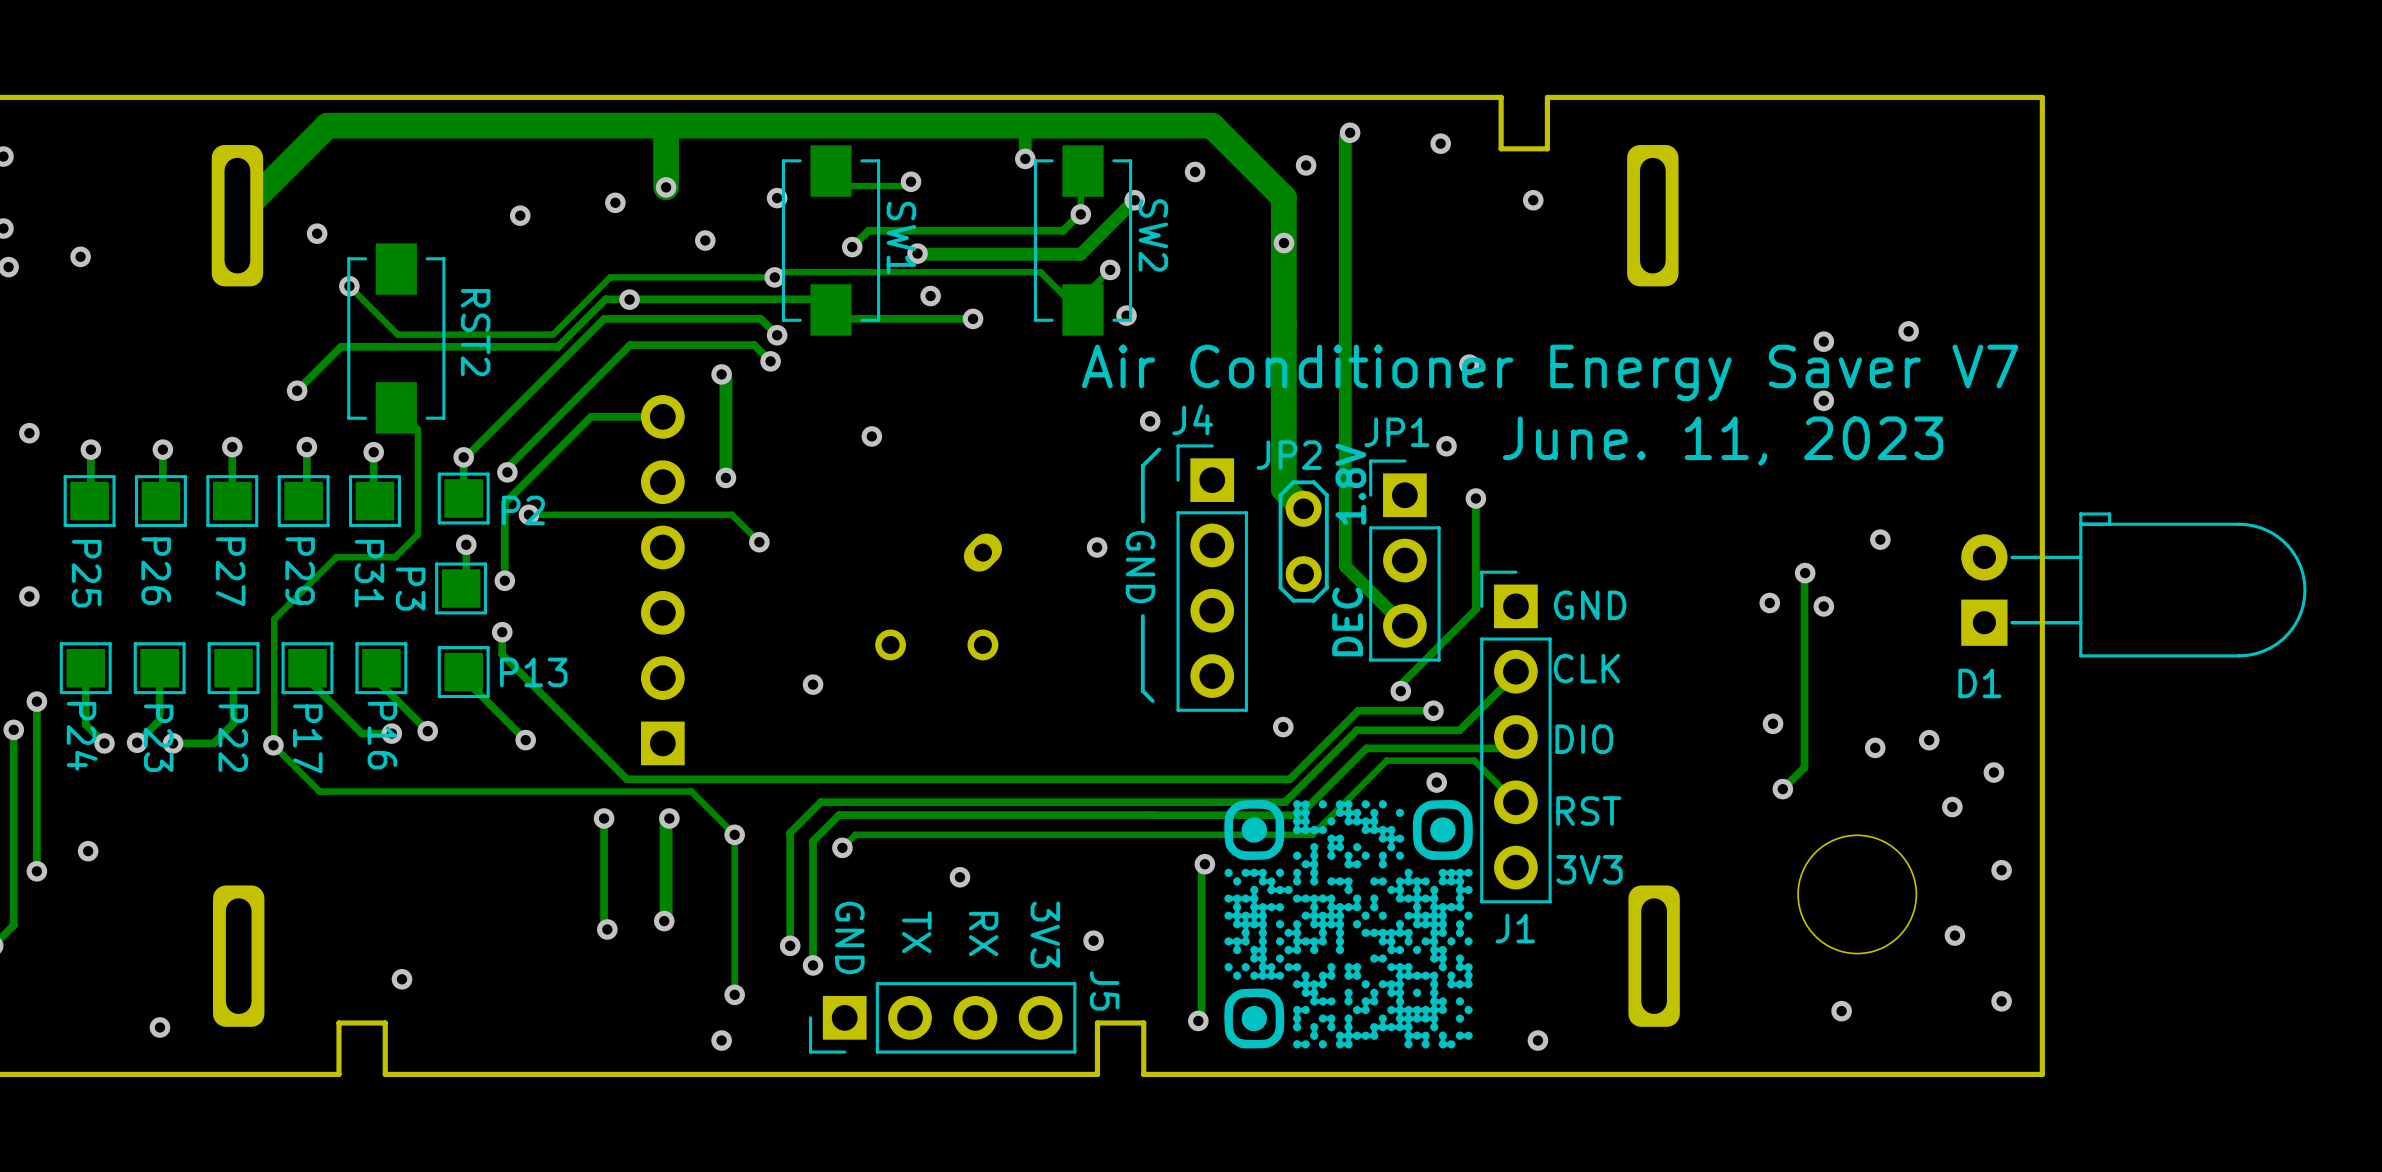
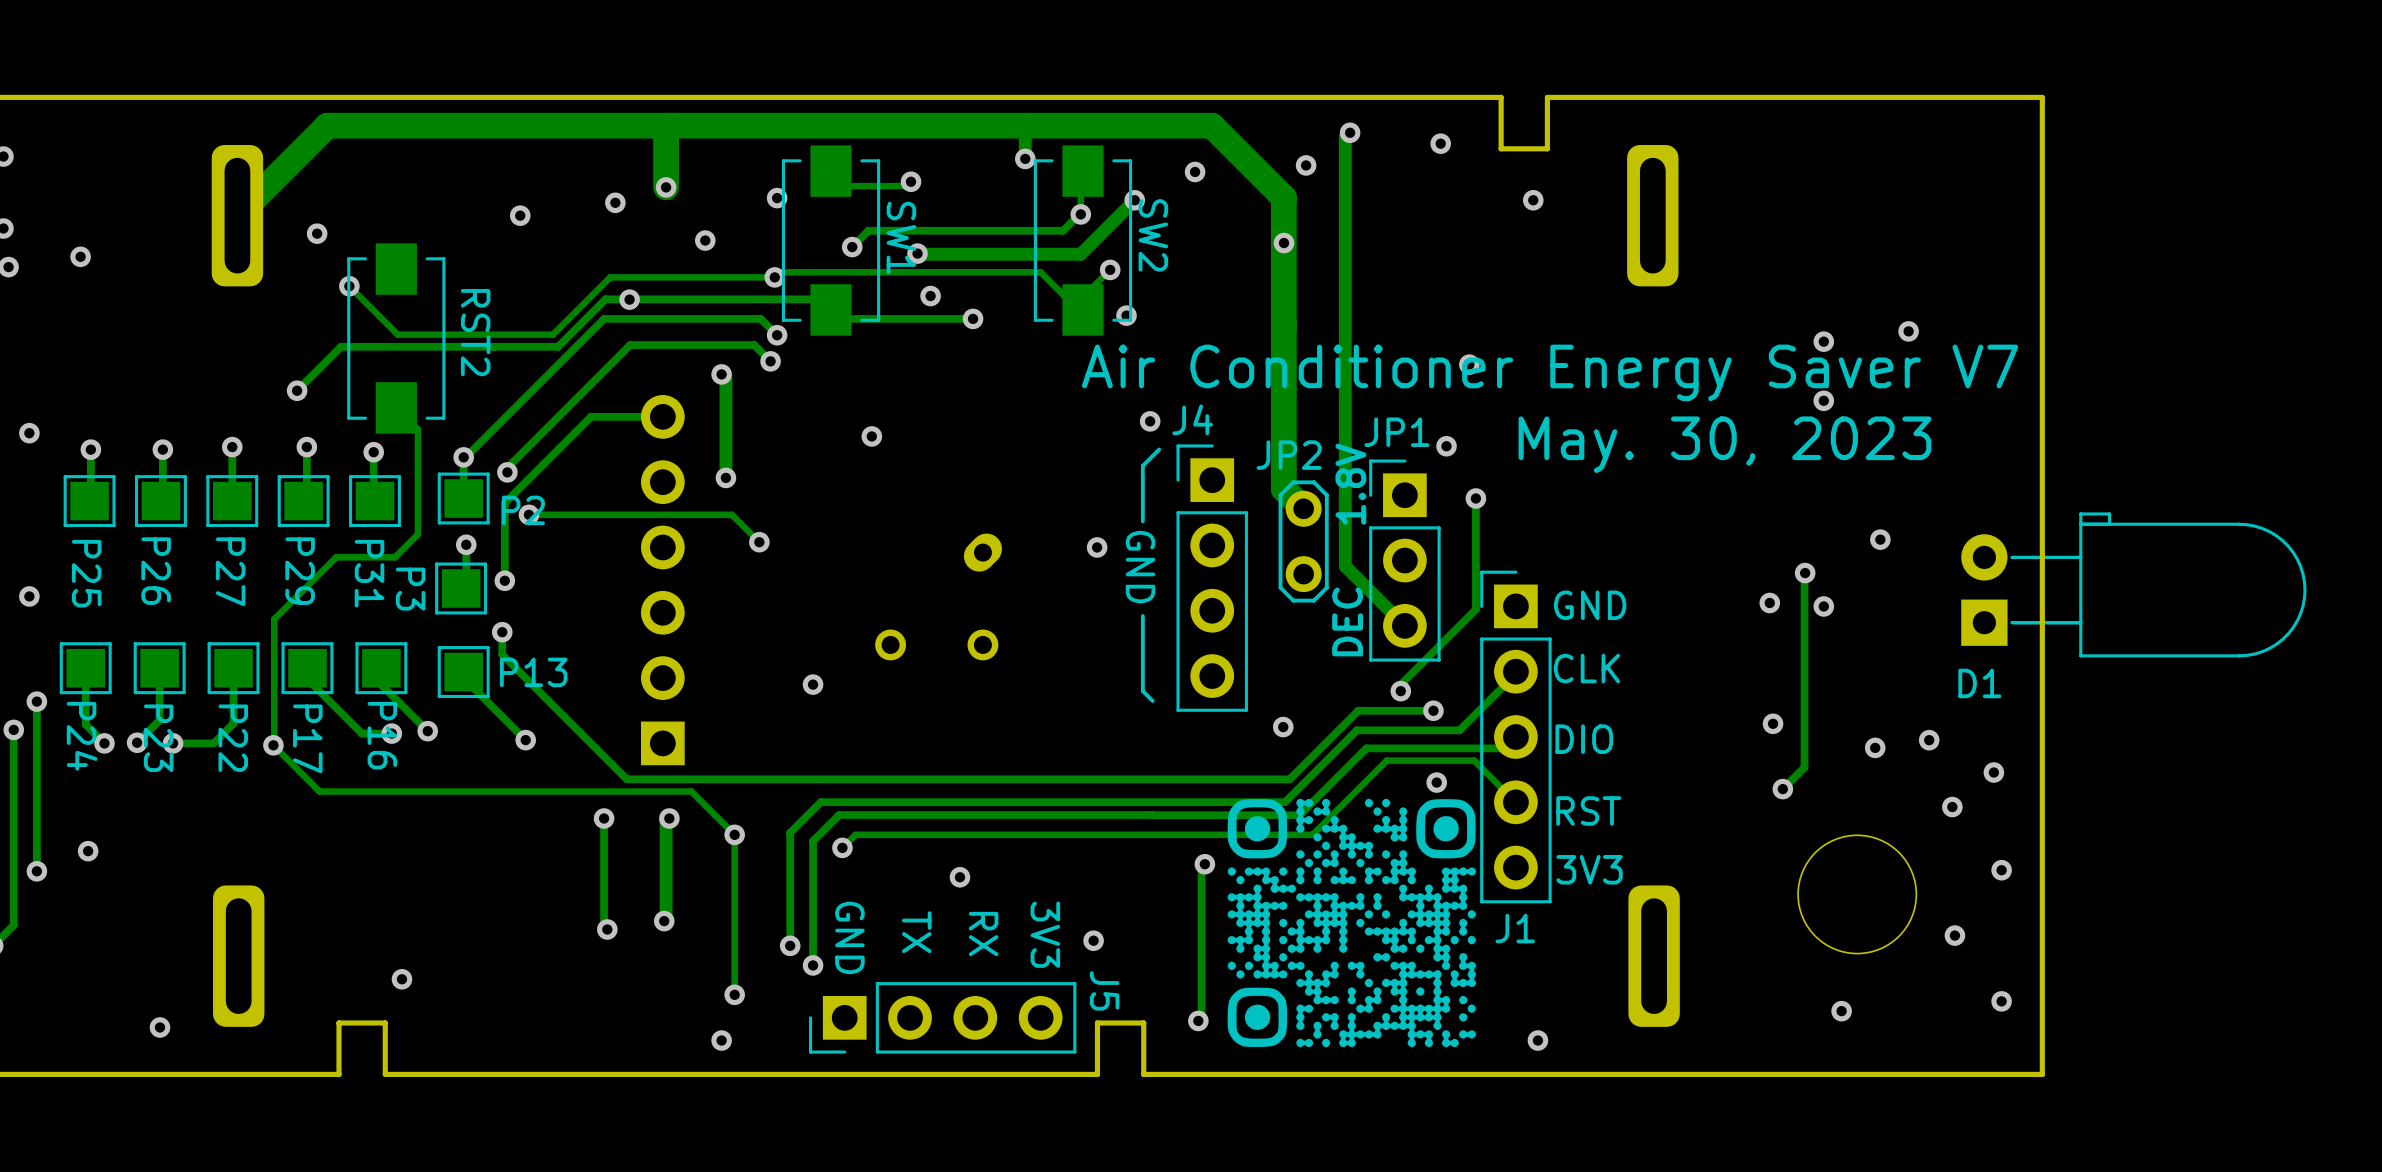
text: June. 11, 2023 (1723, 441) -> May. 30, 2023 (1724, 444)
drawing shape: [1224, 800, 1473, 1049] -> [1227, 798, 1477, 1048]

